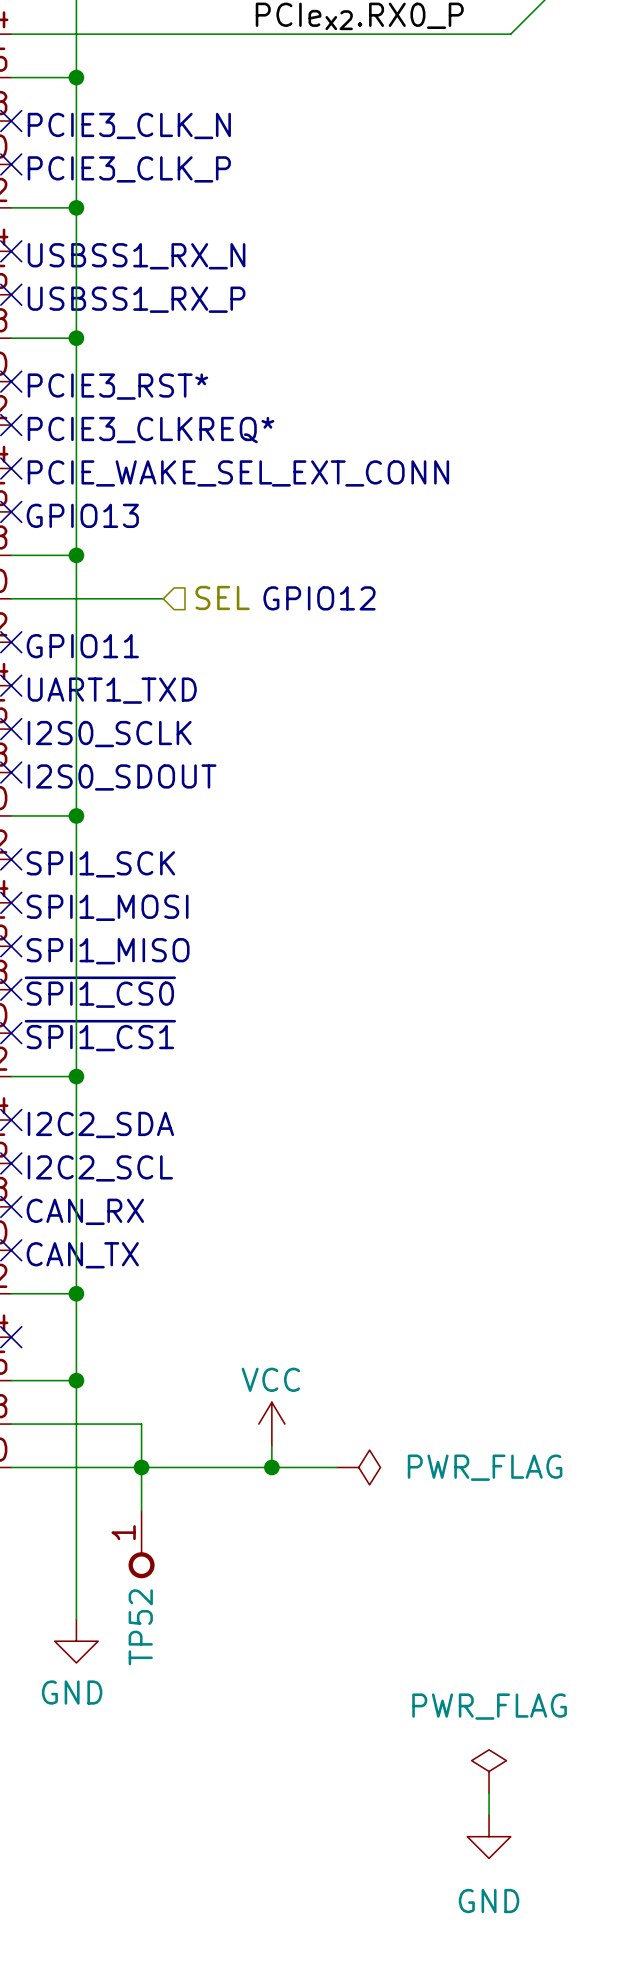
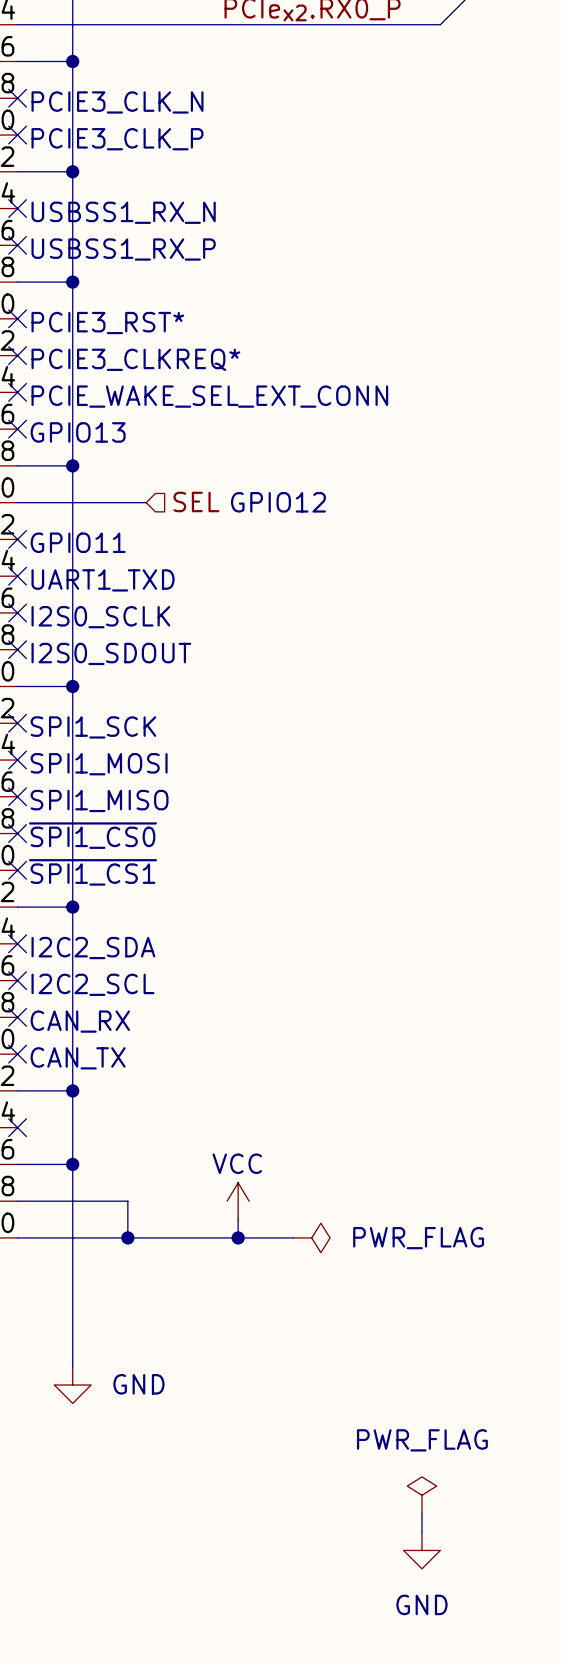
wire: (141, 1467) (141, 1510) -> none
TP52: (141, 1544) -> none
power symbol text position: GND (72, 1692) -> GND (138, 1384)

